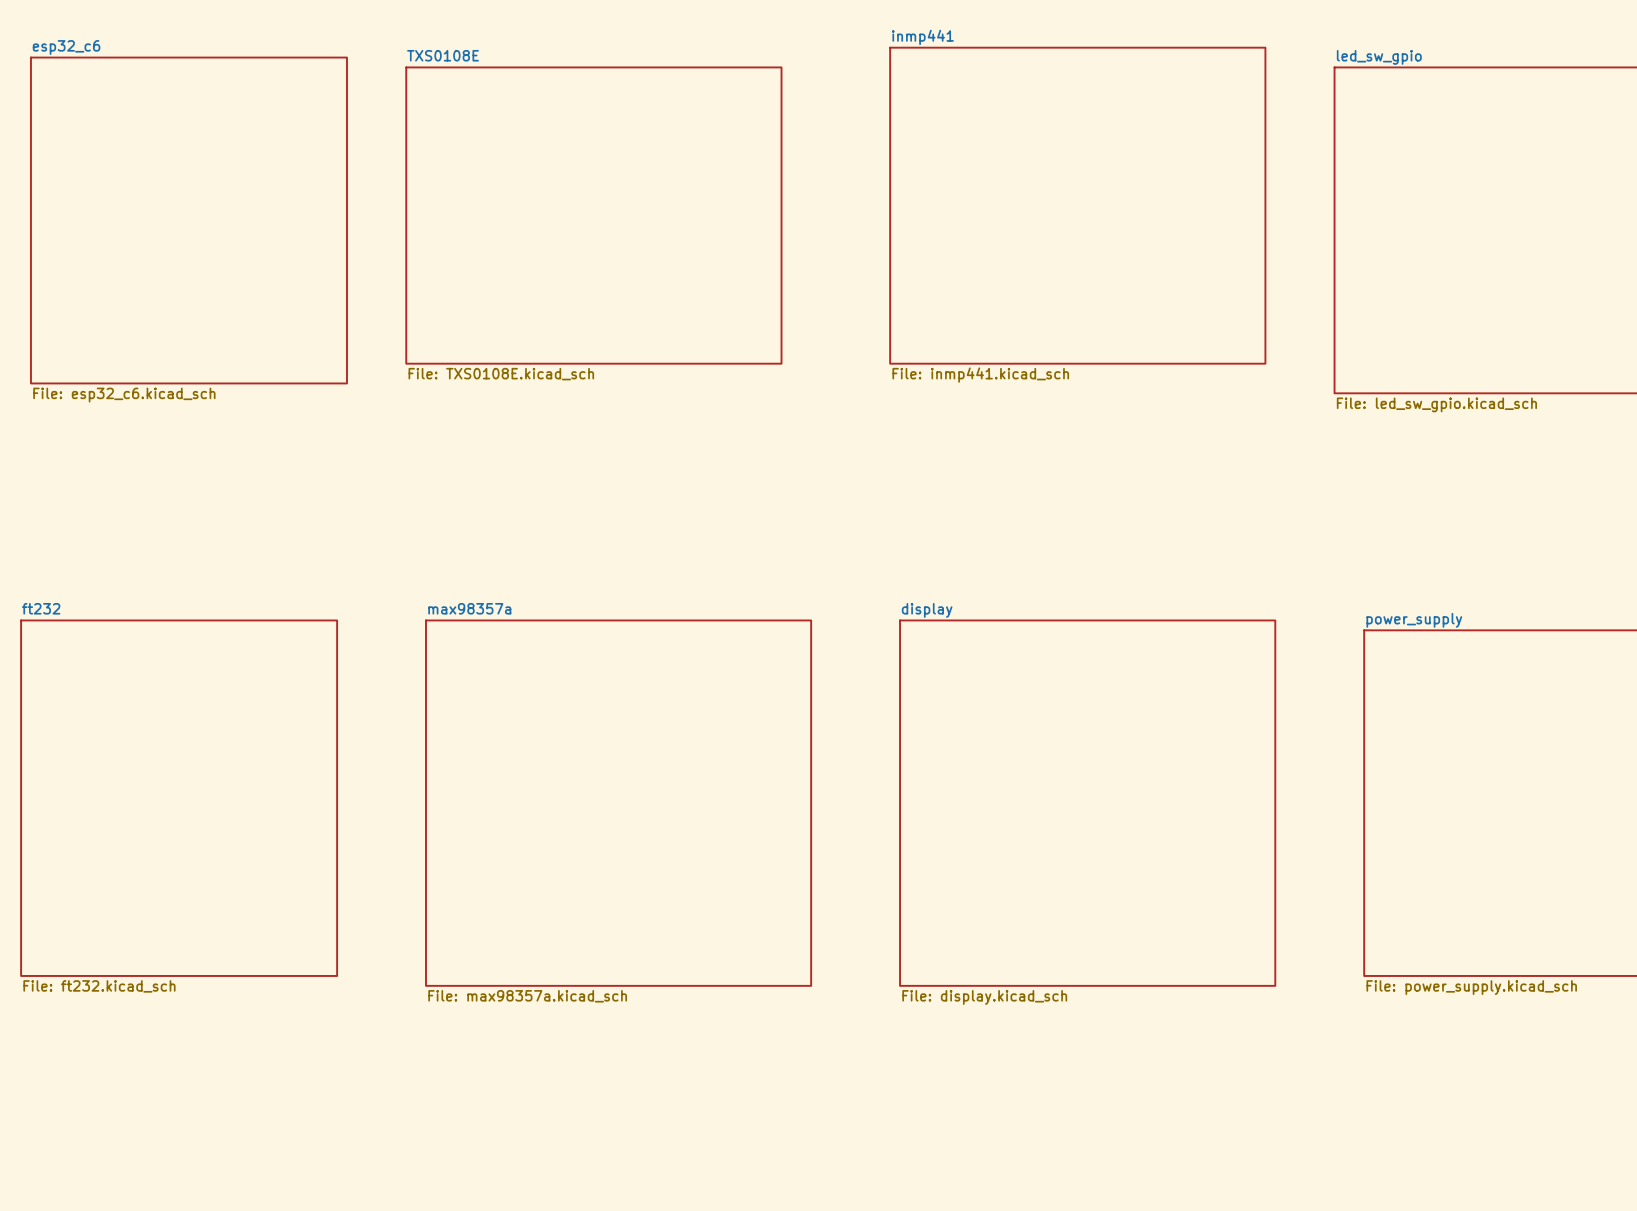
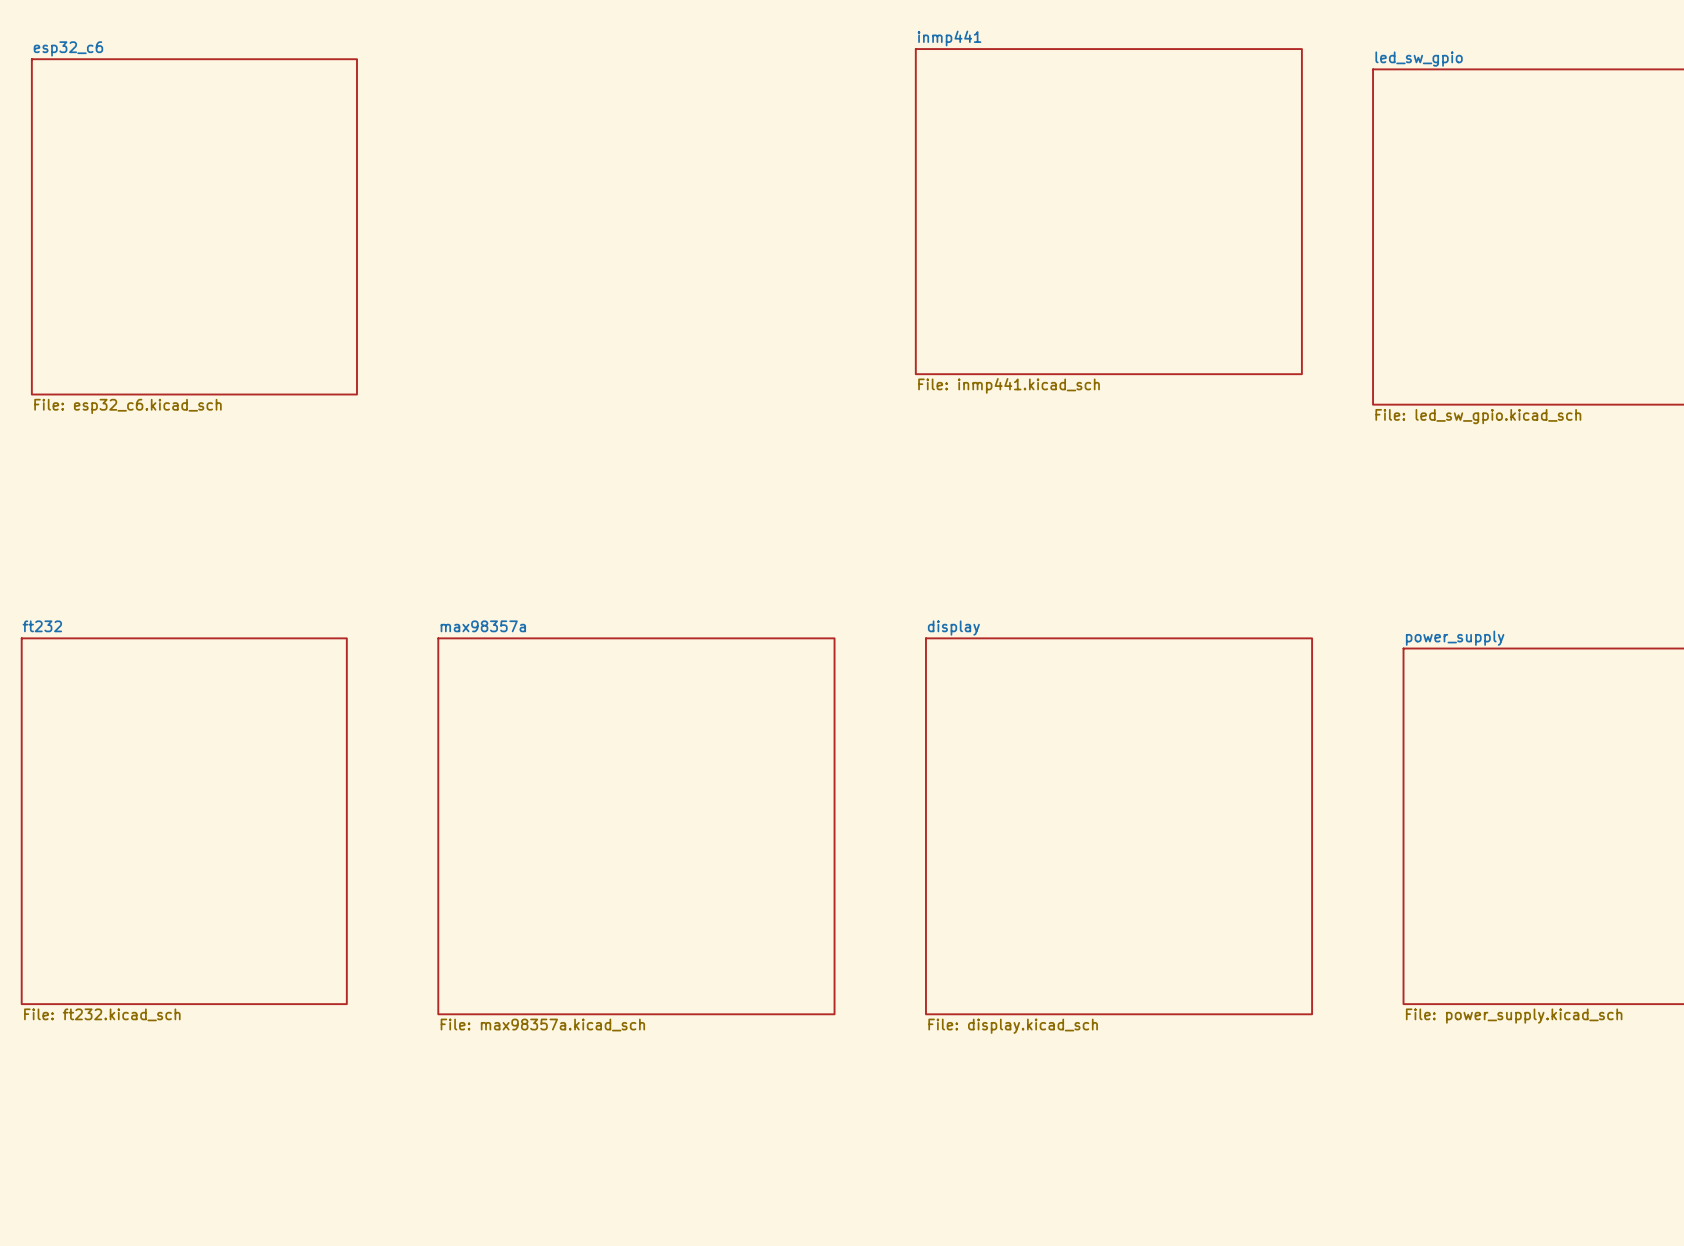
sheet TXS0108E: File: TXS0108E.kicad_sch (593, 215) -> none

